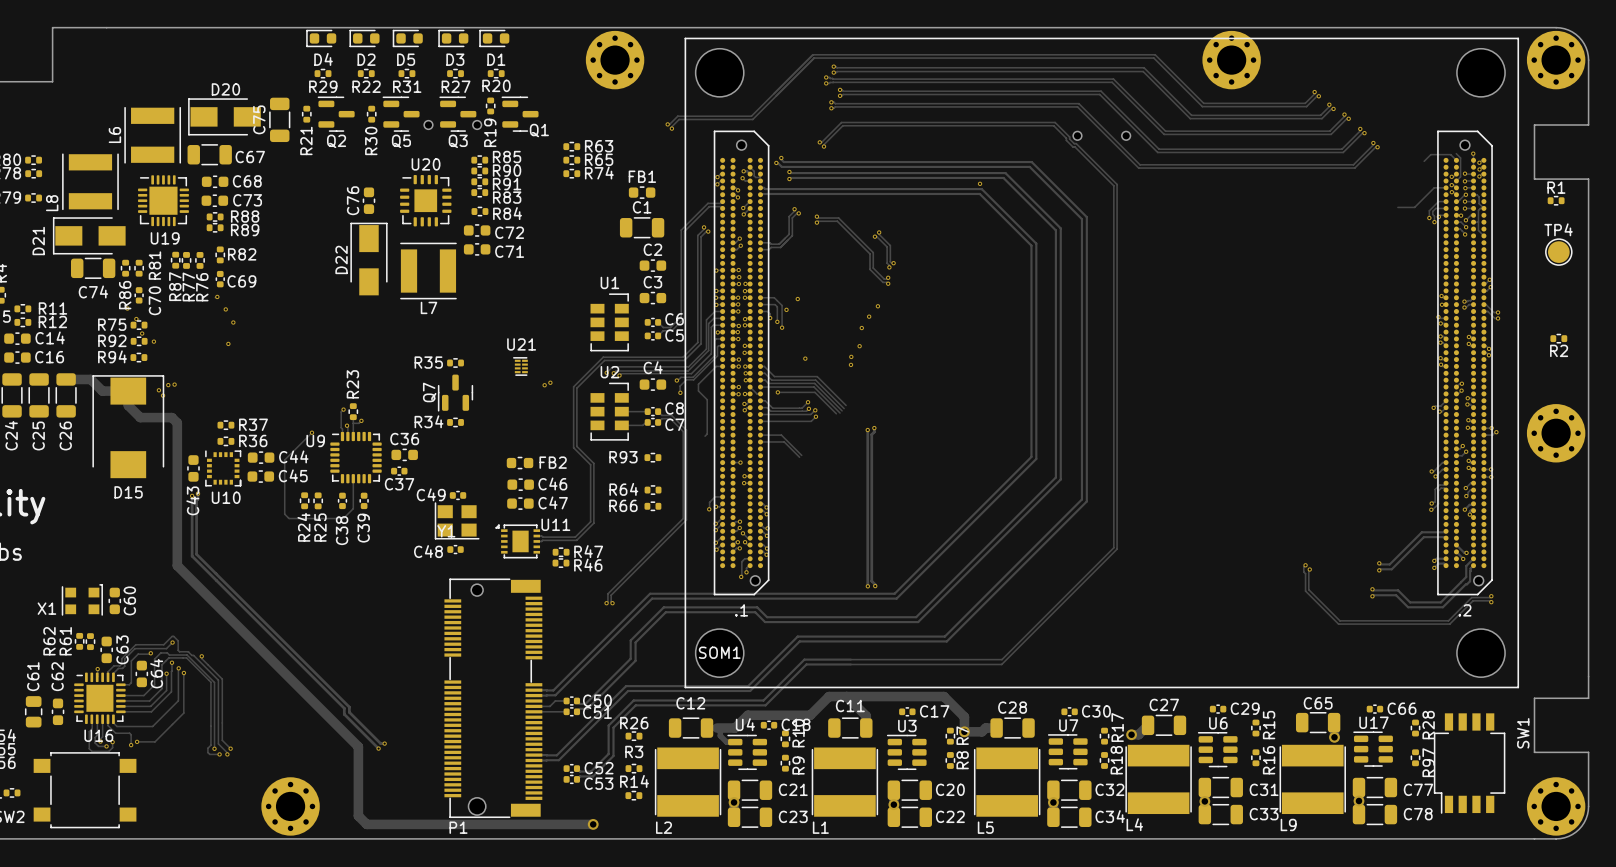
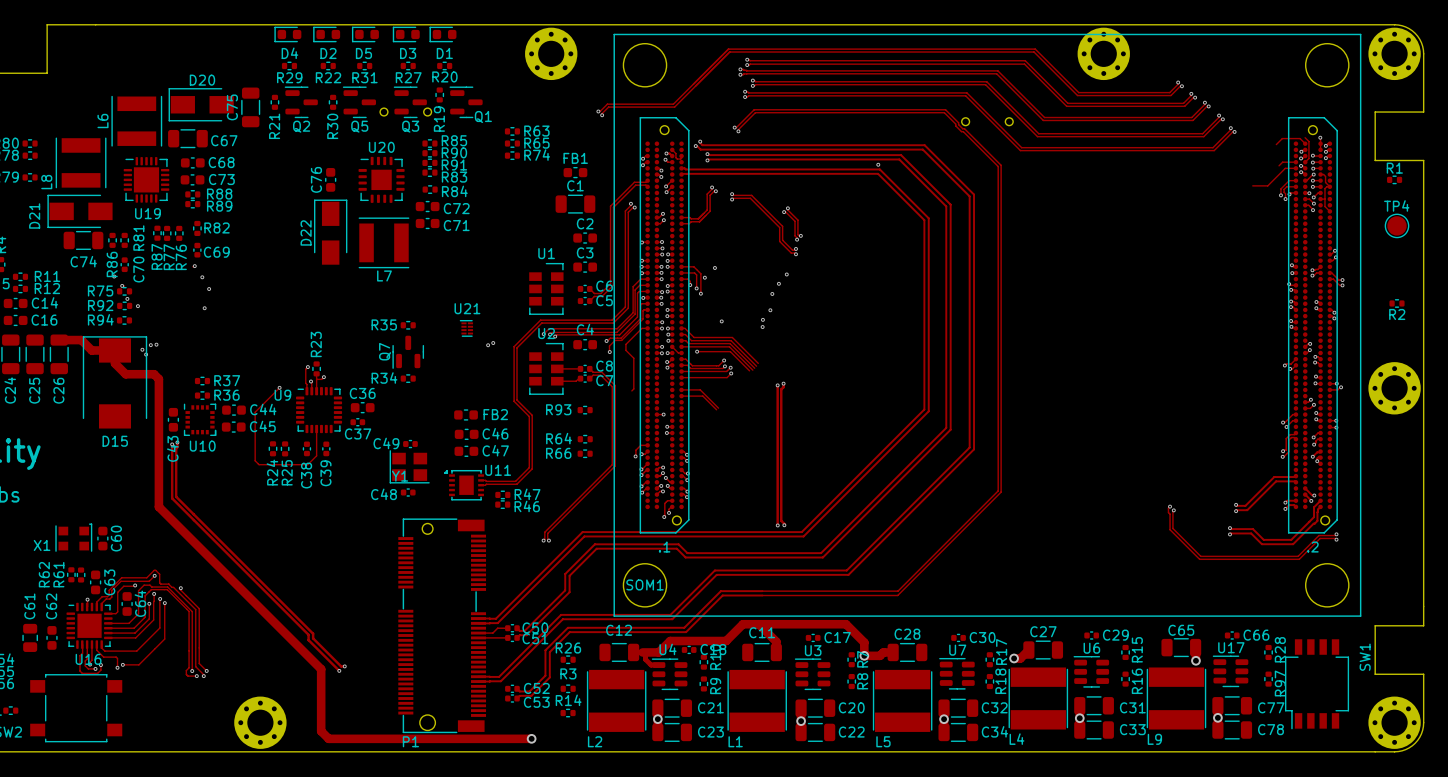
via: none -> (1301, 151)
track: none -> (1295, 162) (1282, 162) (1279, 165)

